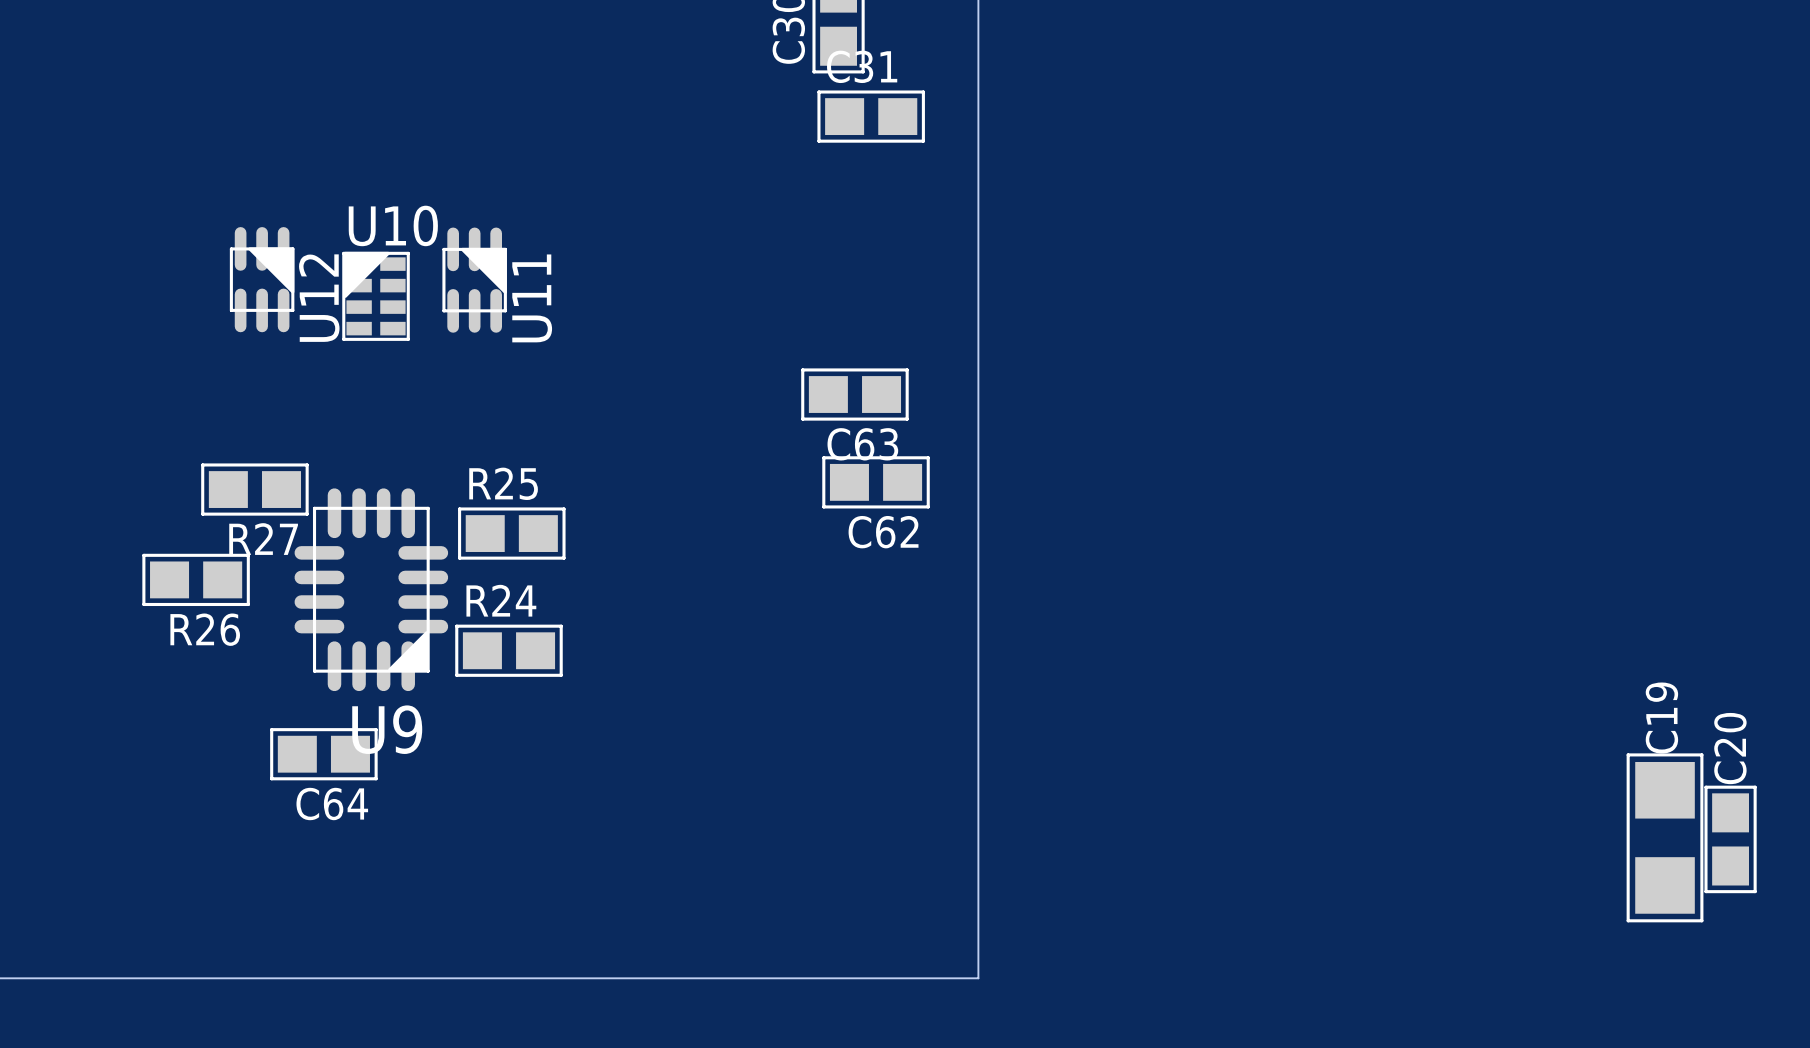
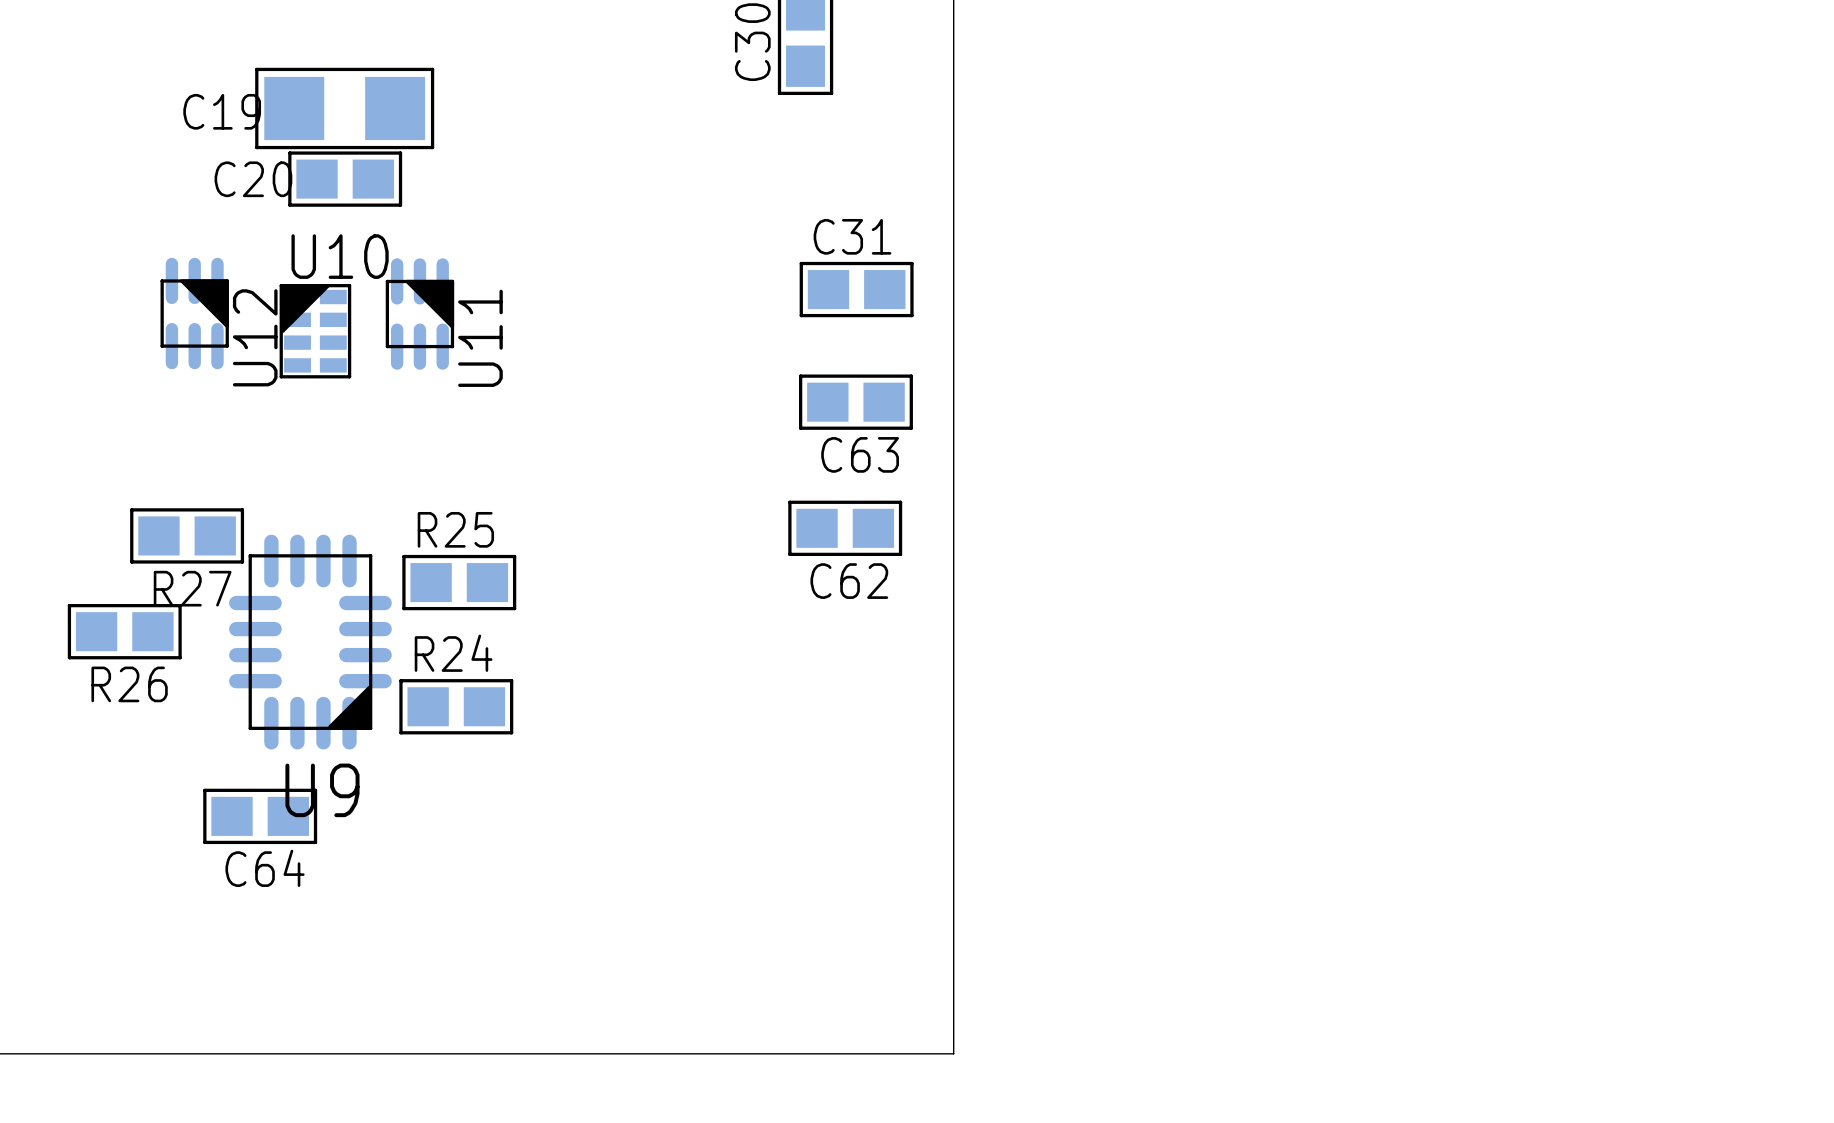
C31 position: (871, 116) -> (856, 289)
C63 position: (854, 394) -> (855, 402)
C19 name position: C19 (1661, 718) -> C19 (222, 111)
C19 rotation: 0° (1665, 837) -> 90° clockwise (344, 108)
C19 position: (1665, 837) -> (344, 108)
C20 rotation: 0° (1730, 839) -> 90° clockwise (345, 179)
C20 position: (1730, 839) -> (345, 179)

